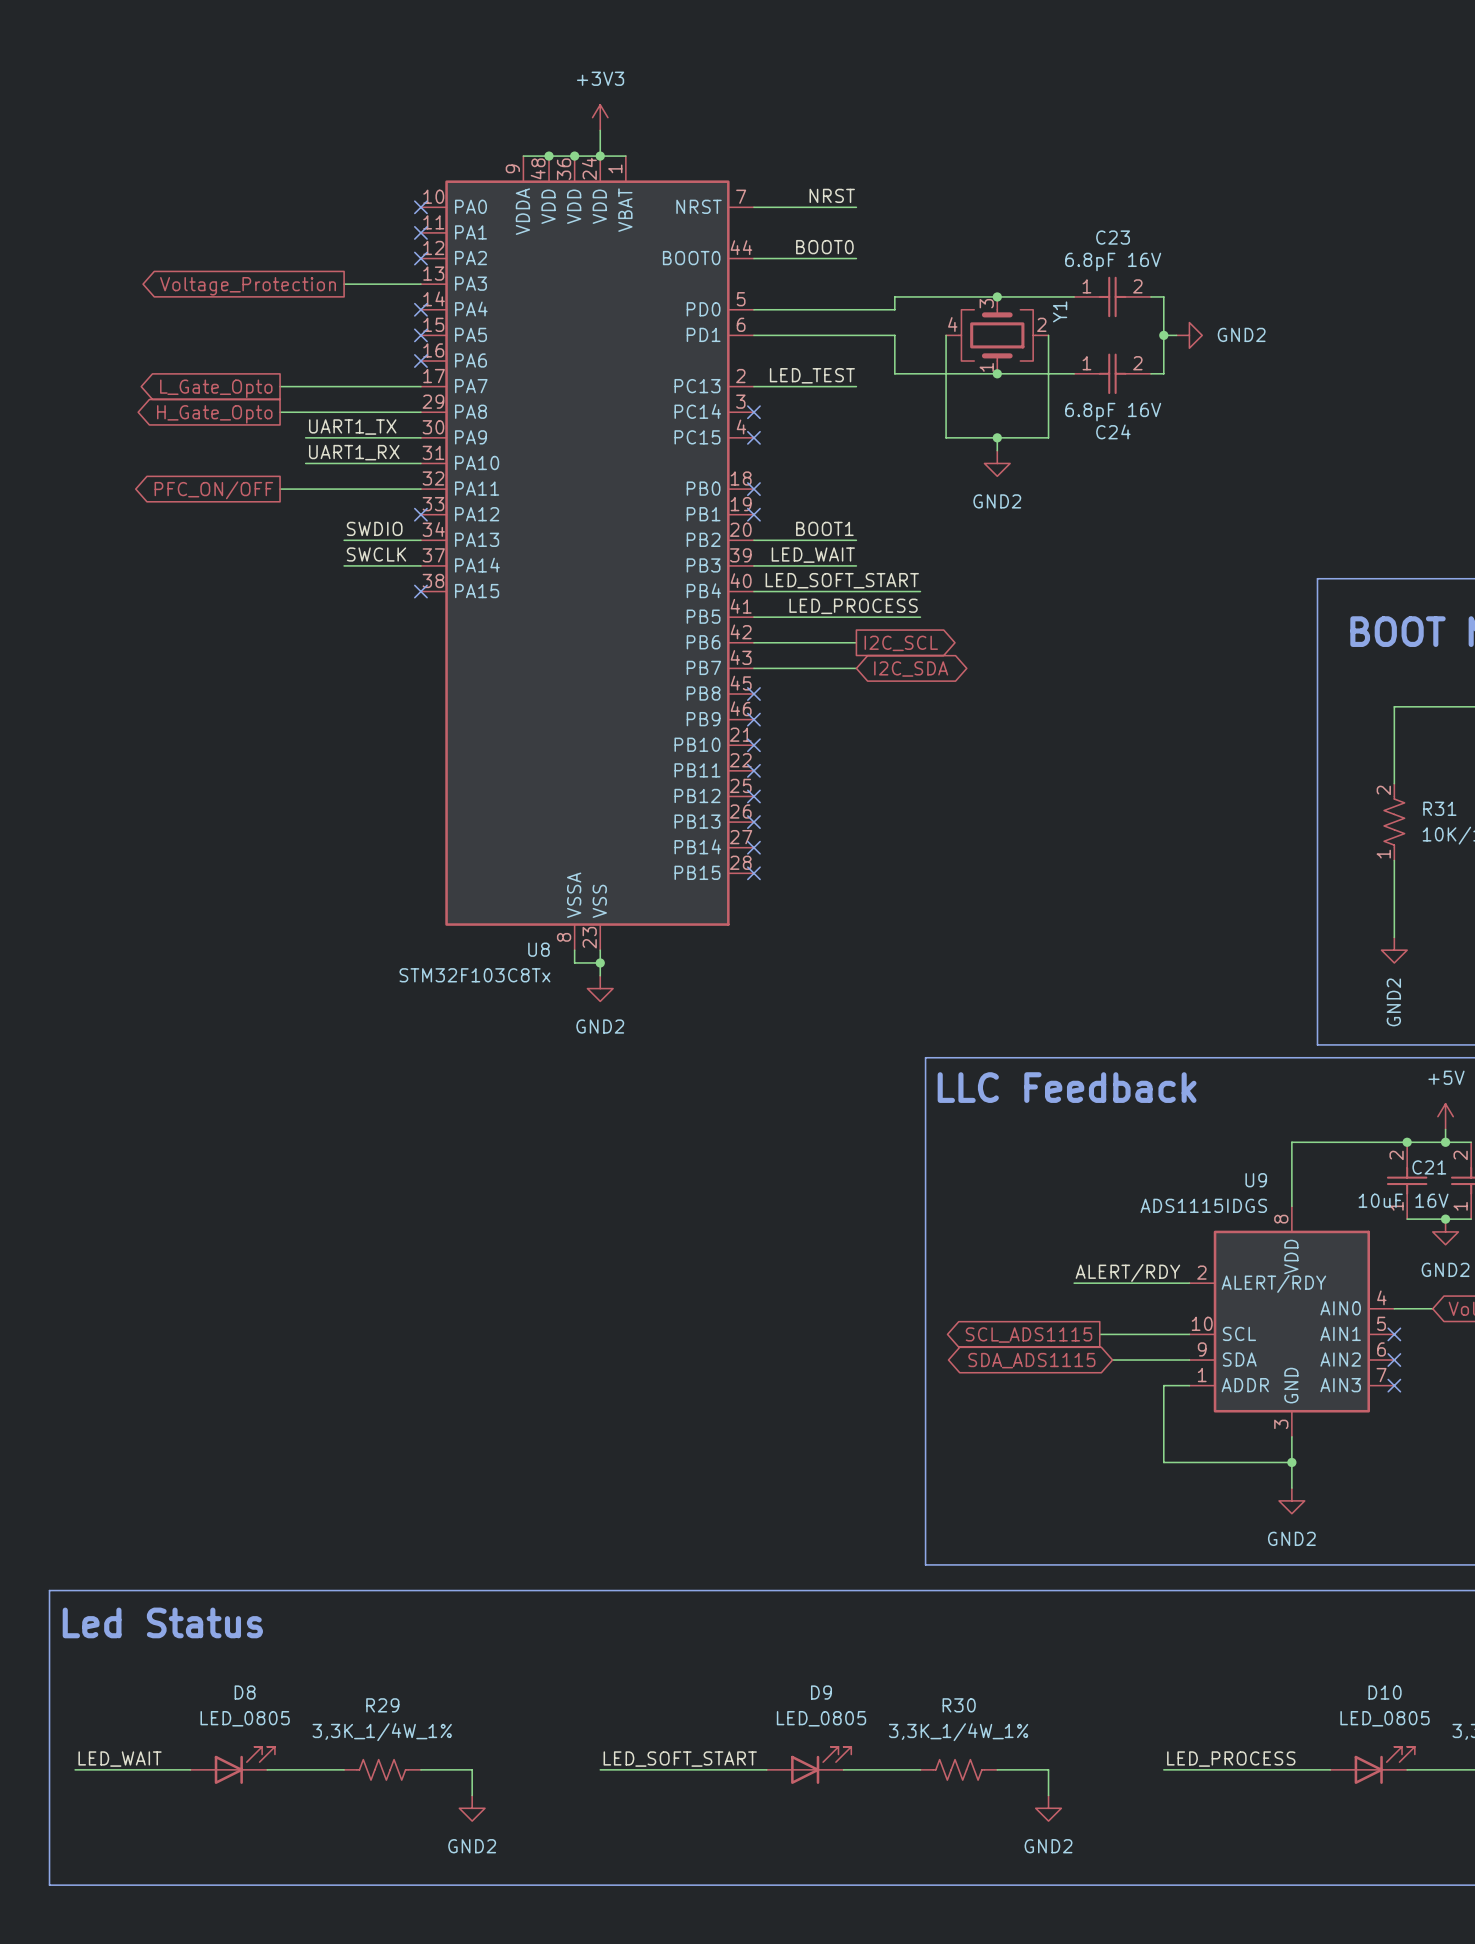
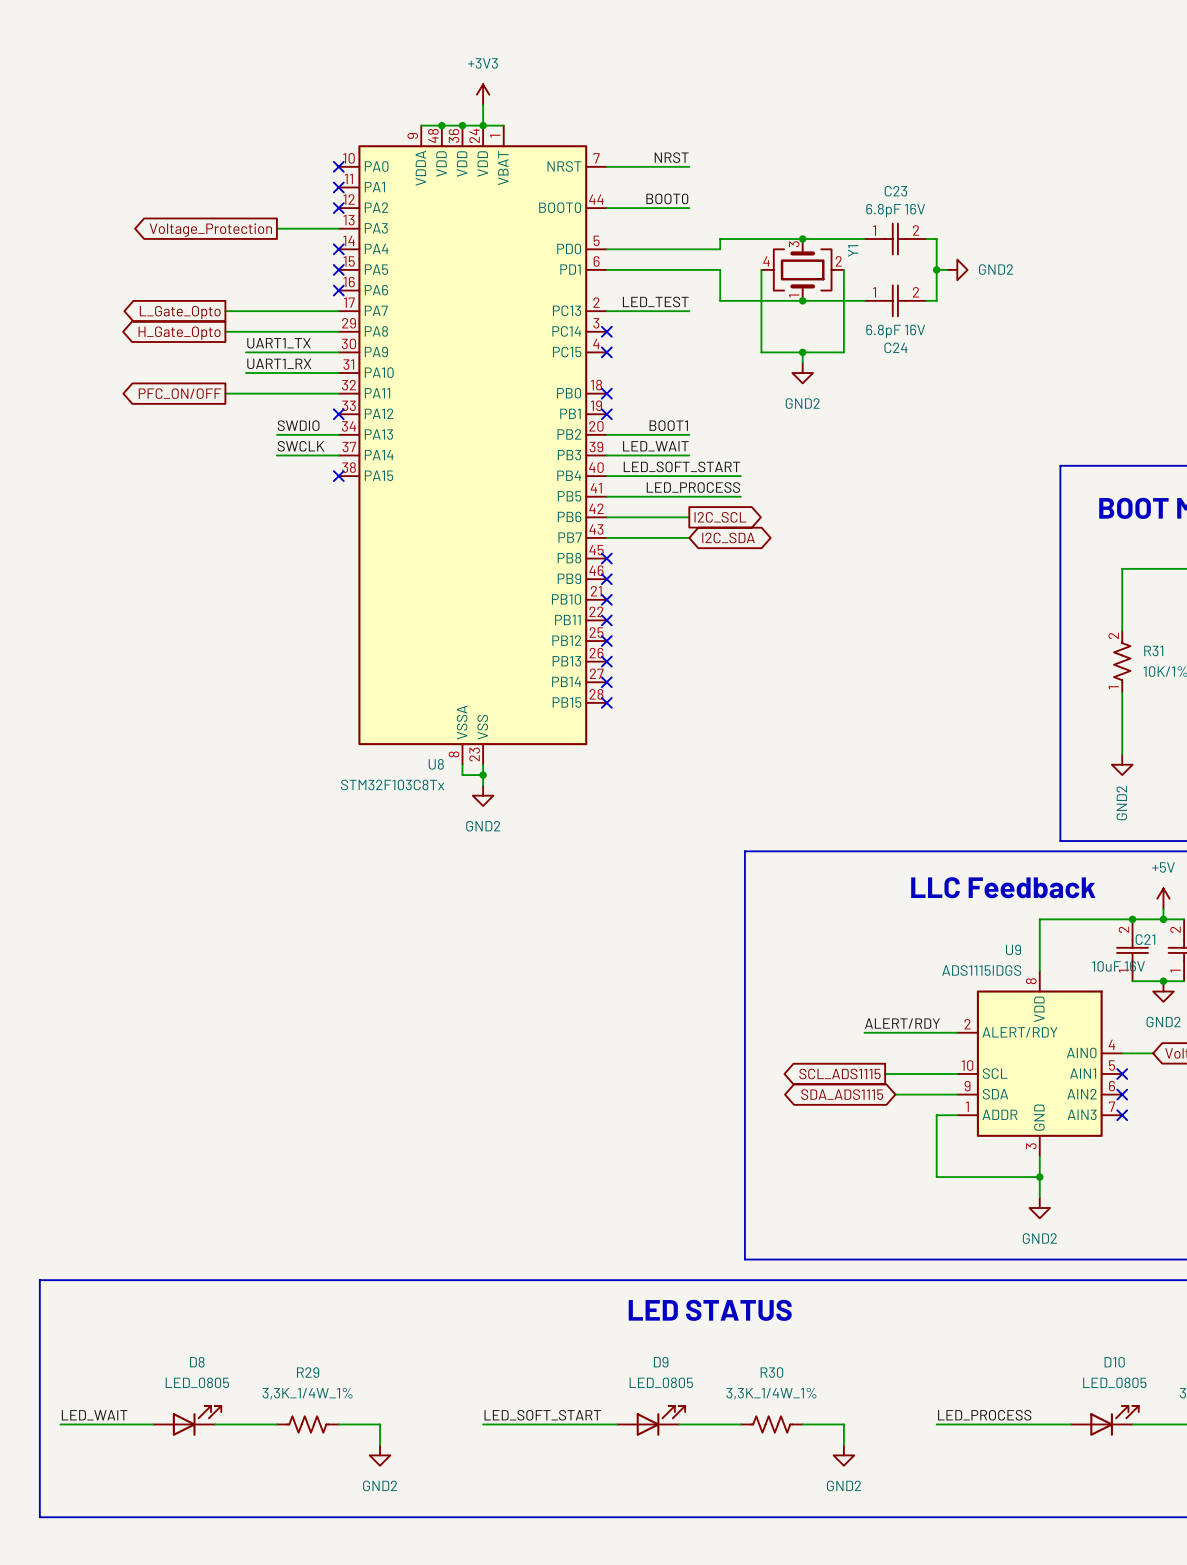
text position: LLC Feedback (1067, 1087) -> LLC Feedback (1003, 887)
text: Led Status (162, 1622) -> none
text: none -> LED STATUS (710, 1310)

